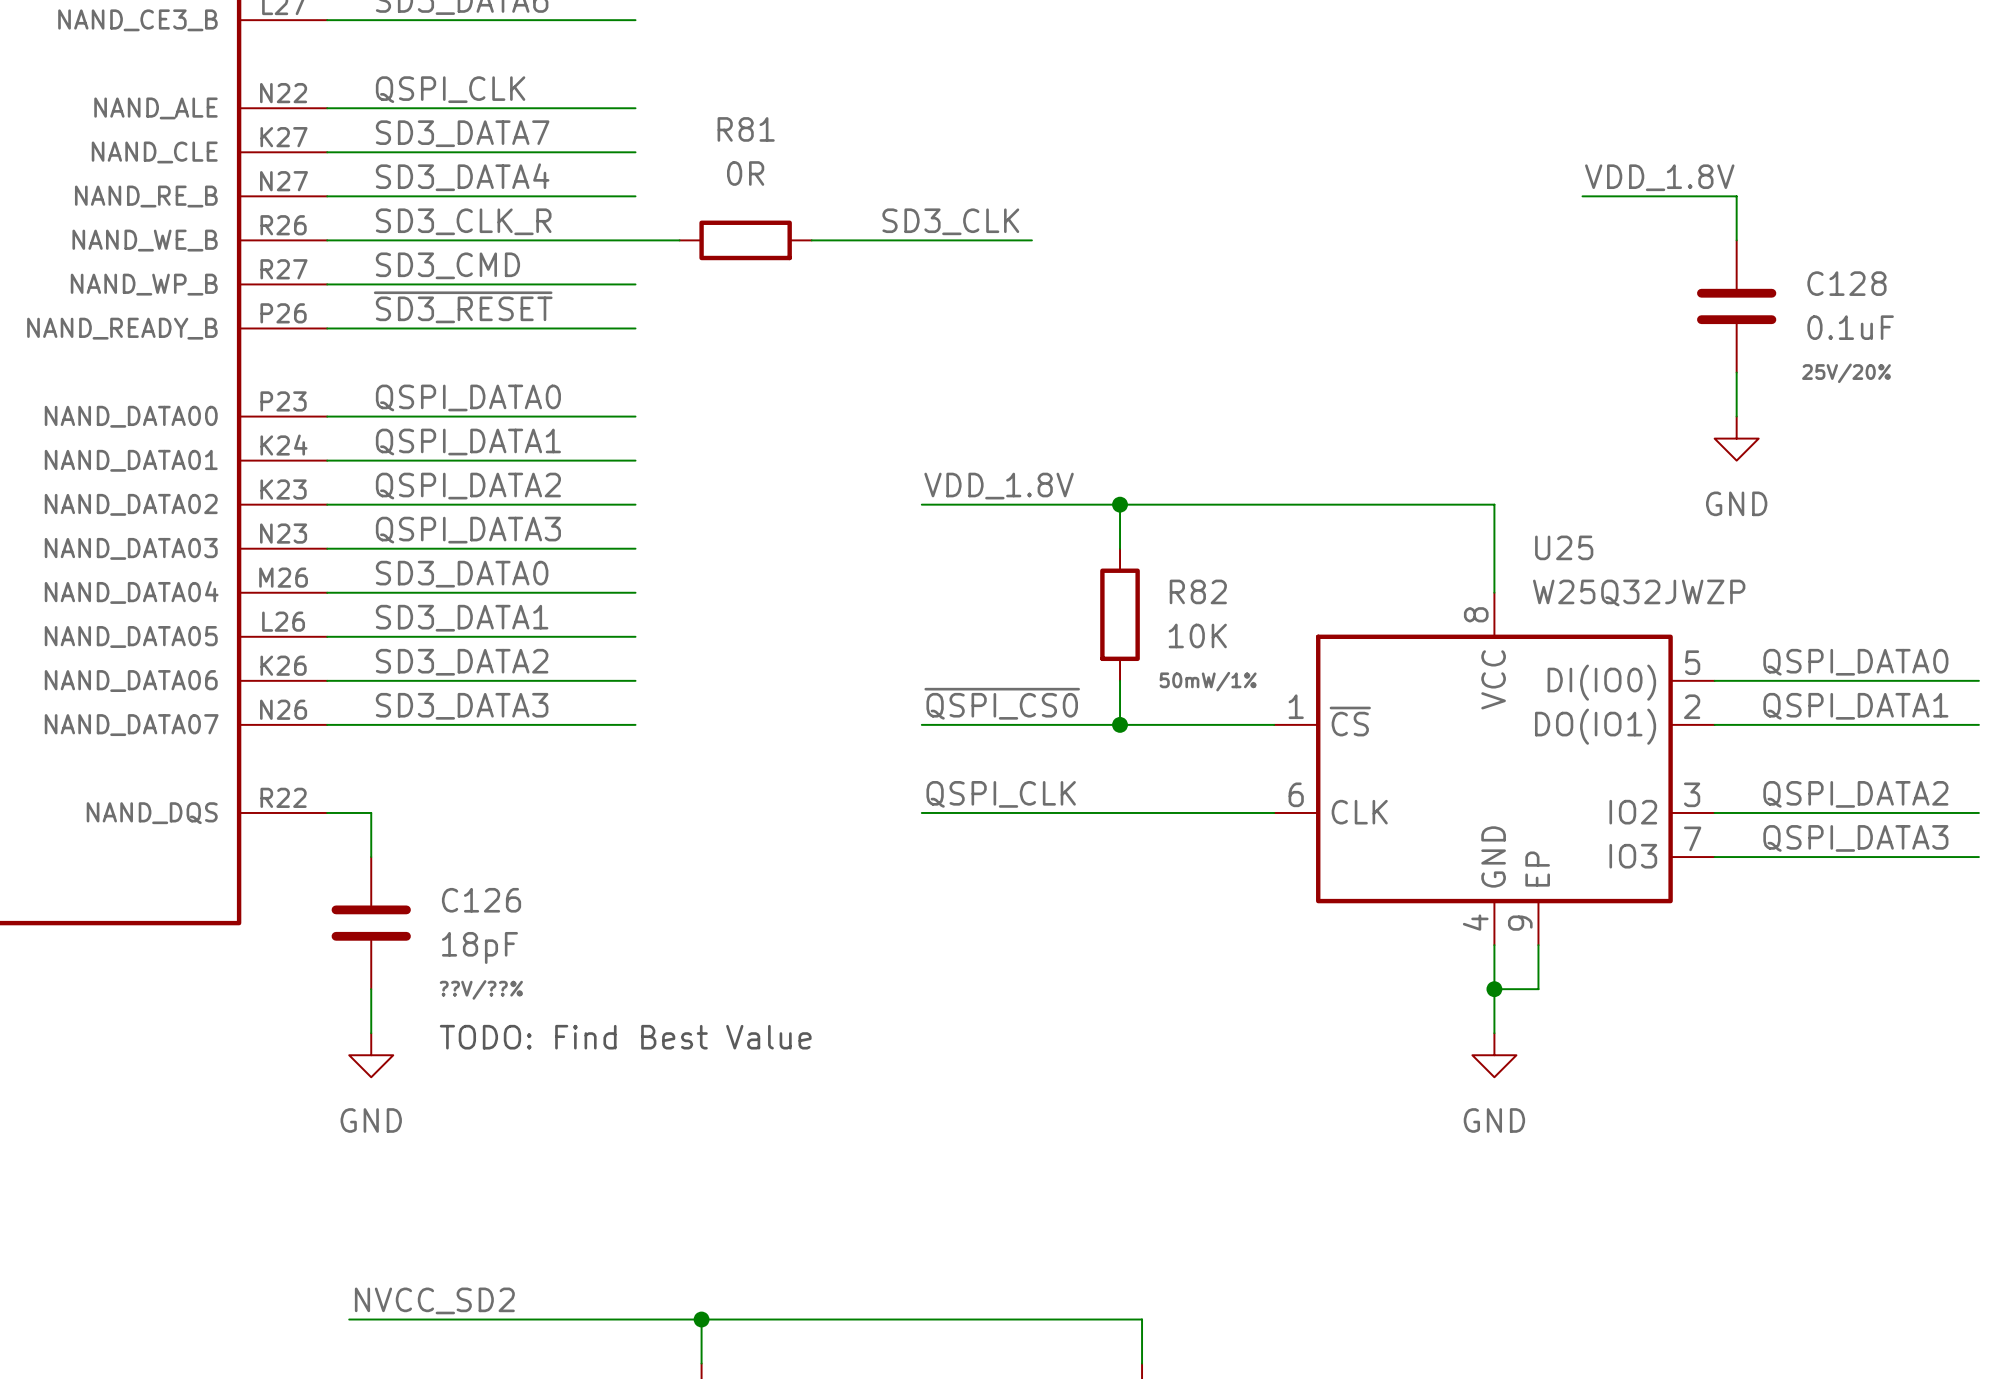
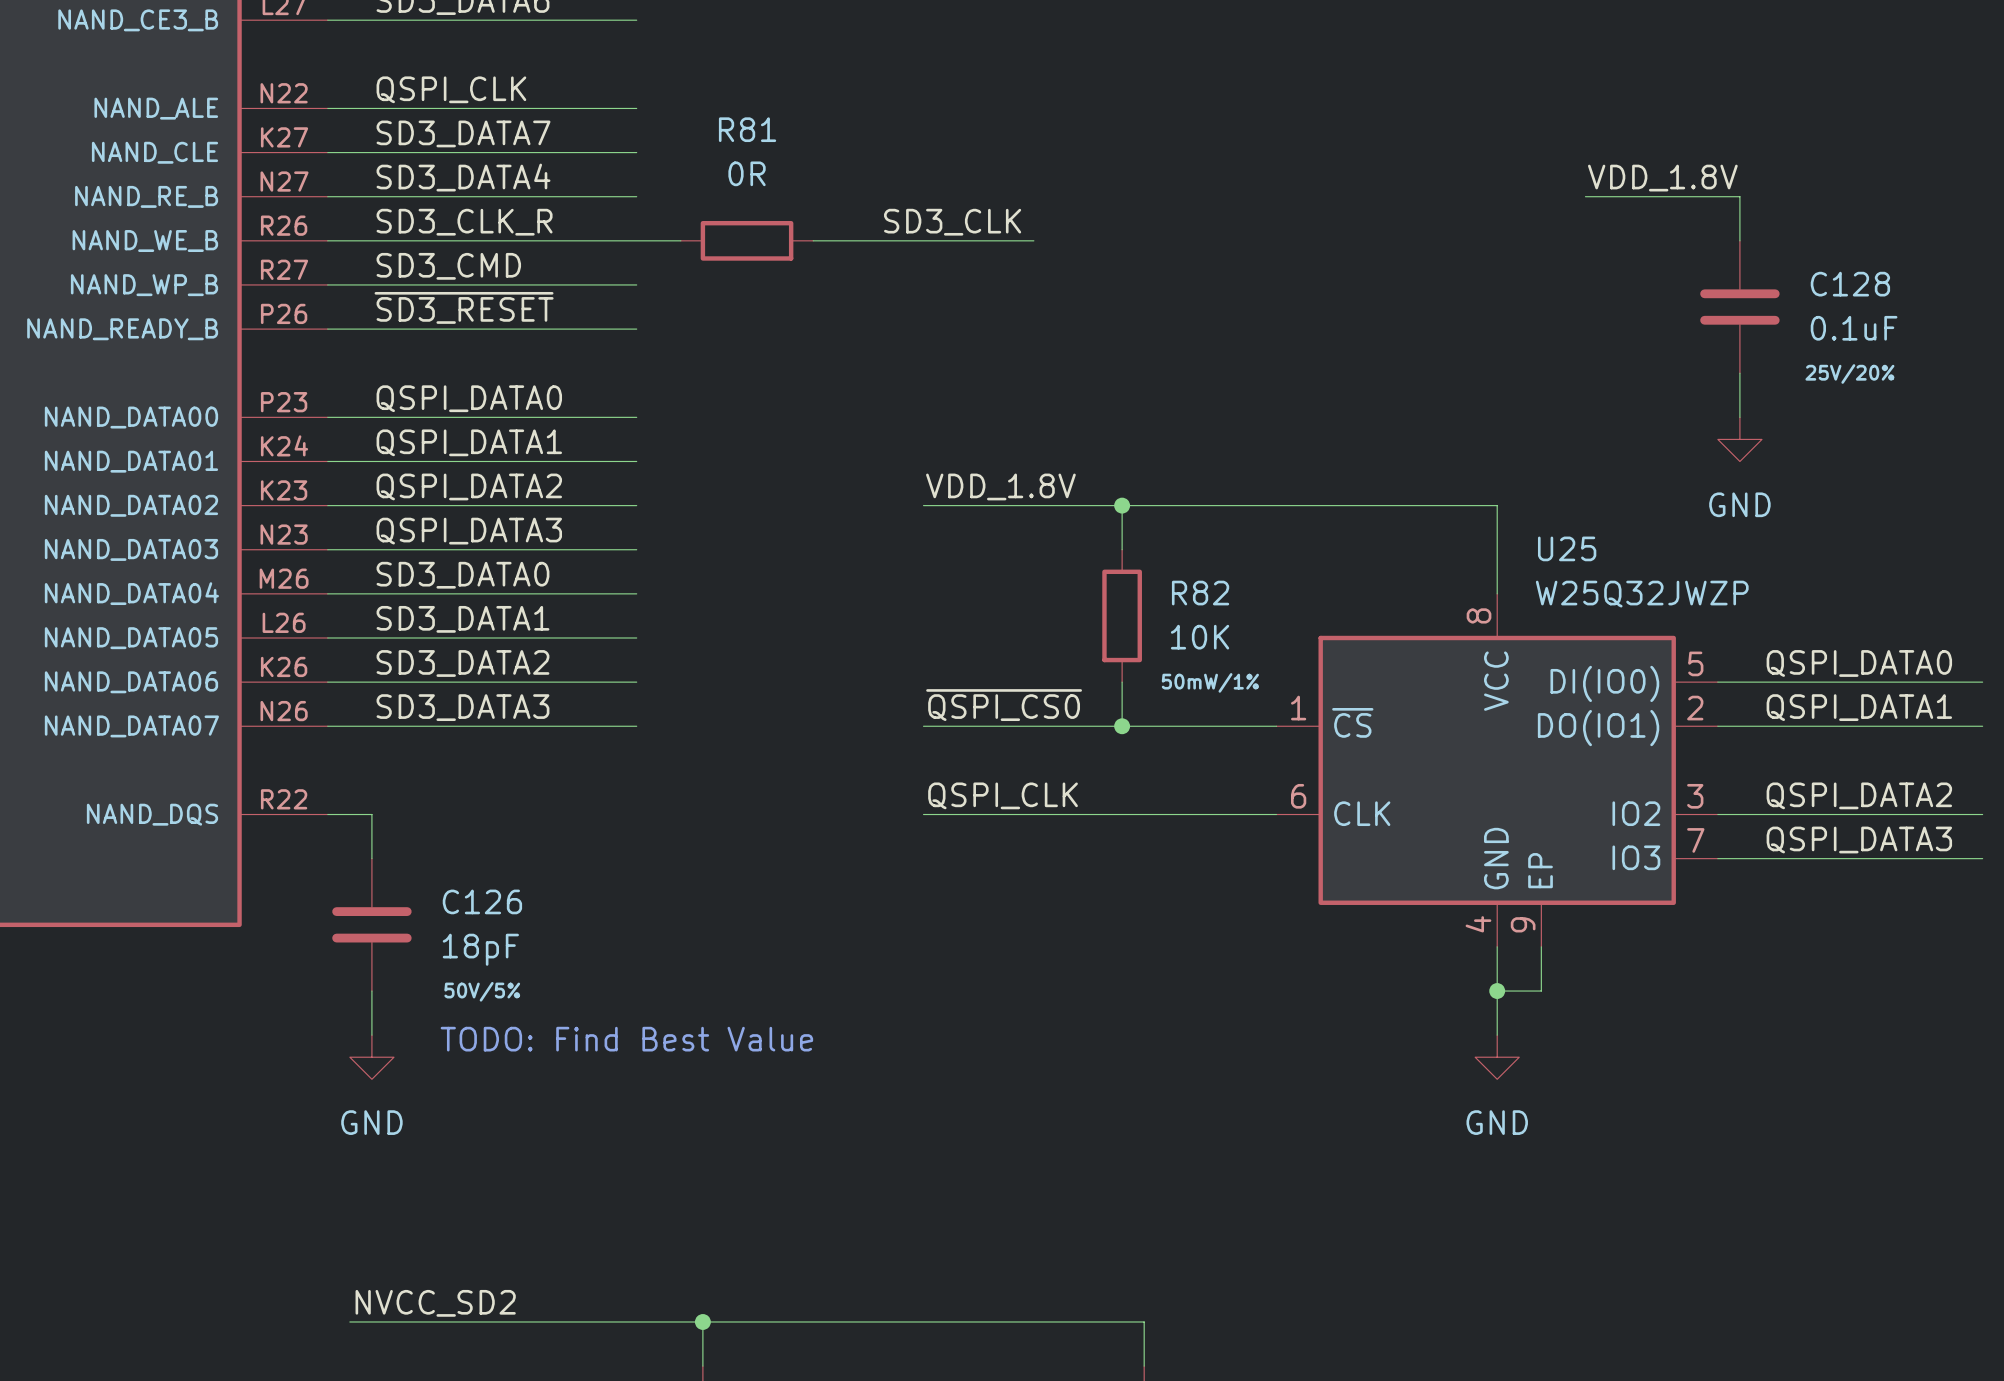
C126 text: ??V/??% (481, 989) -> 50V/5% (482, 991)

